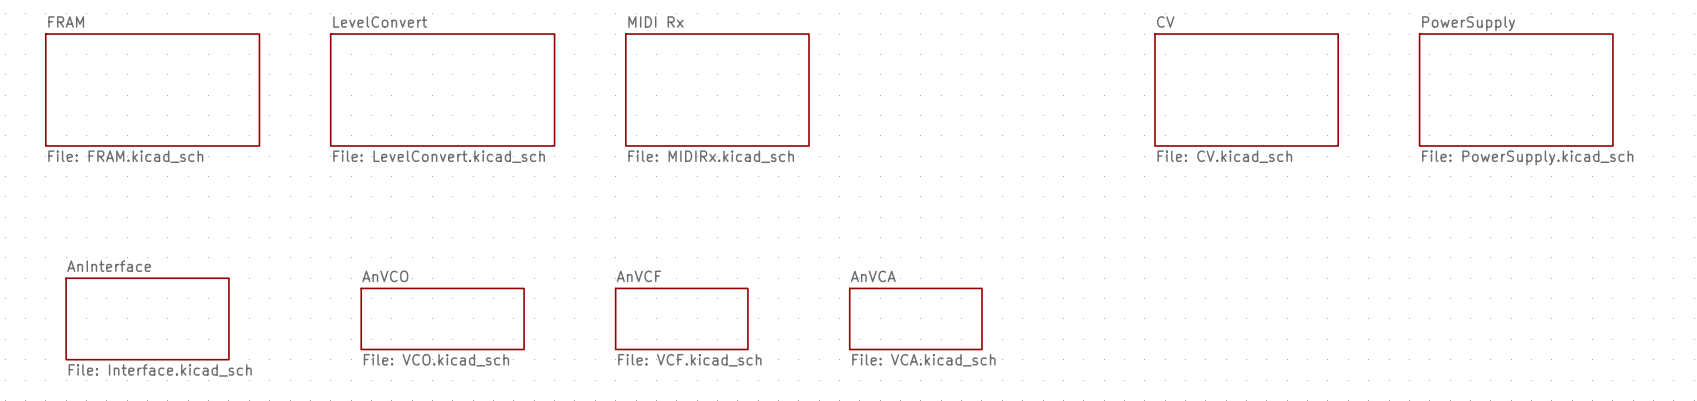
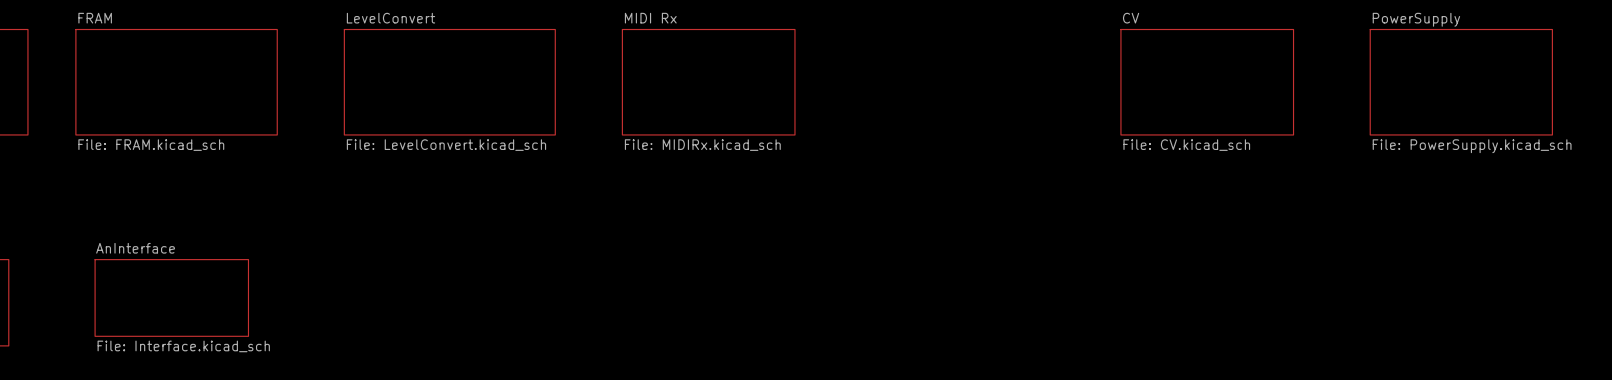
sheet AnVCO: File: VCO.kicad_sch (442, 318) -> none
sheet AnVCF: File: VCF.kicad_sch (681, 318) -> none
sheet AnVCA: File: VCA.kicad_sch (915, 318) -> none

